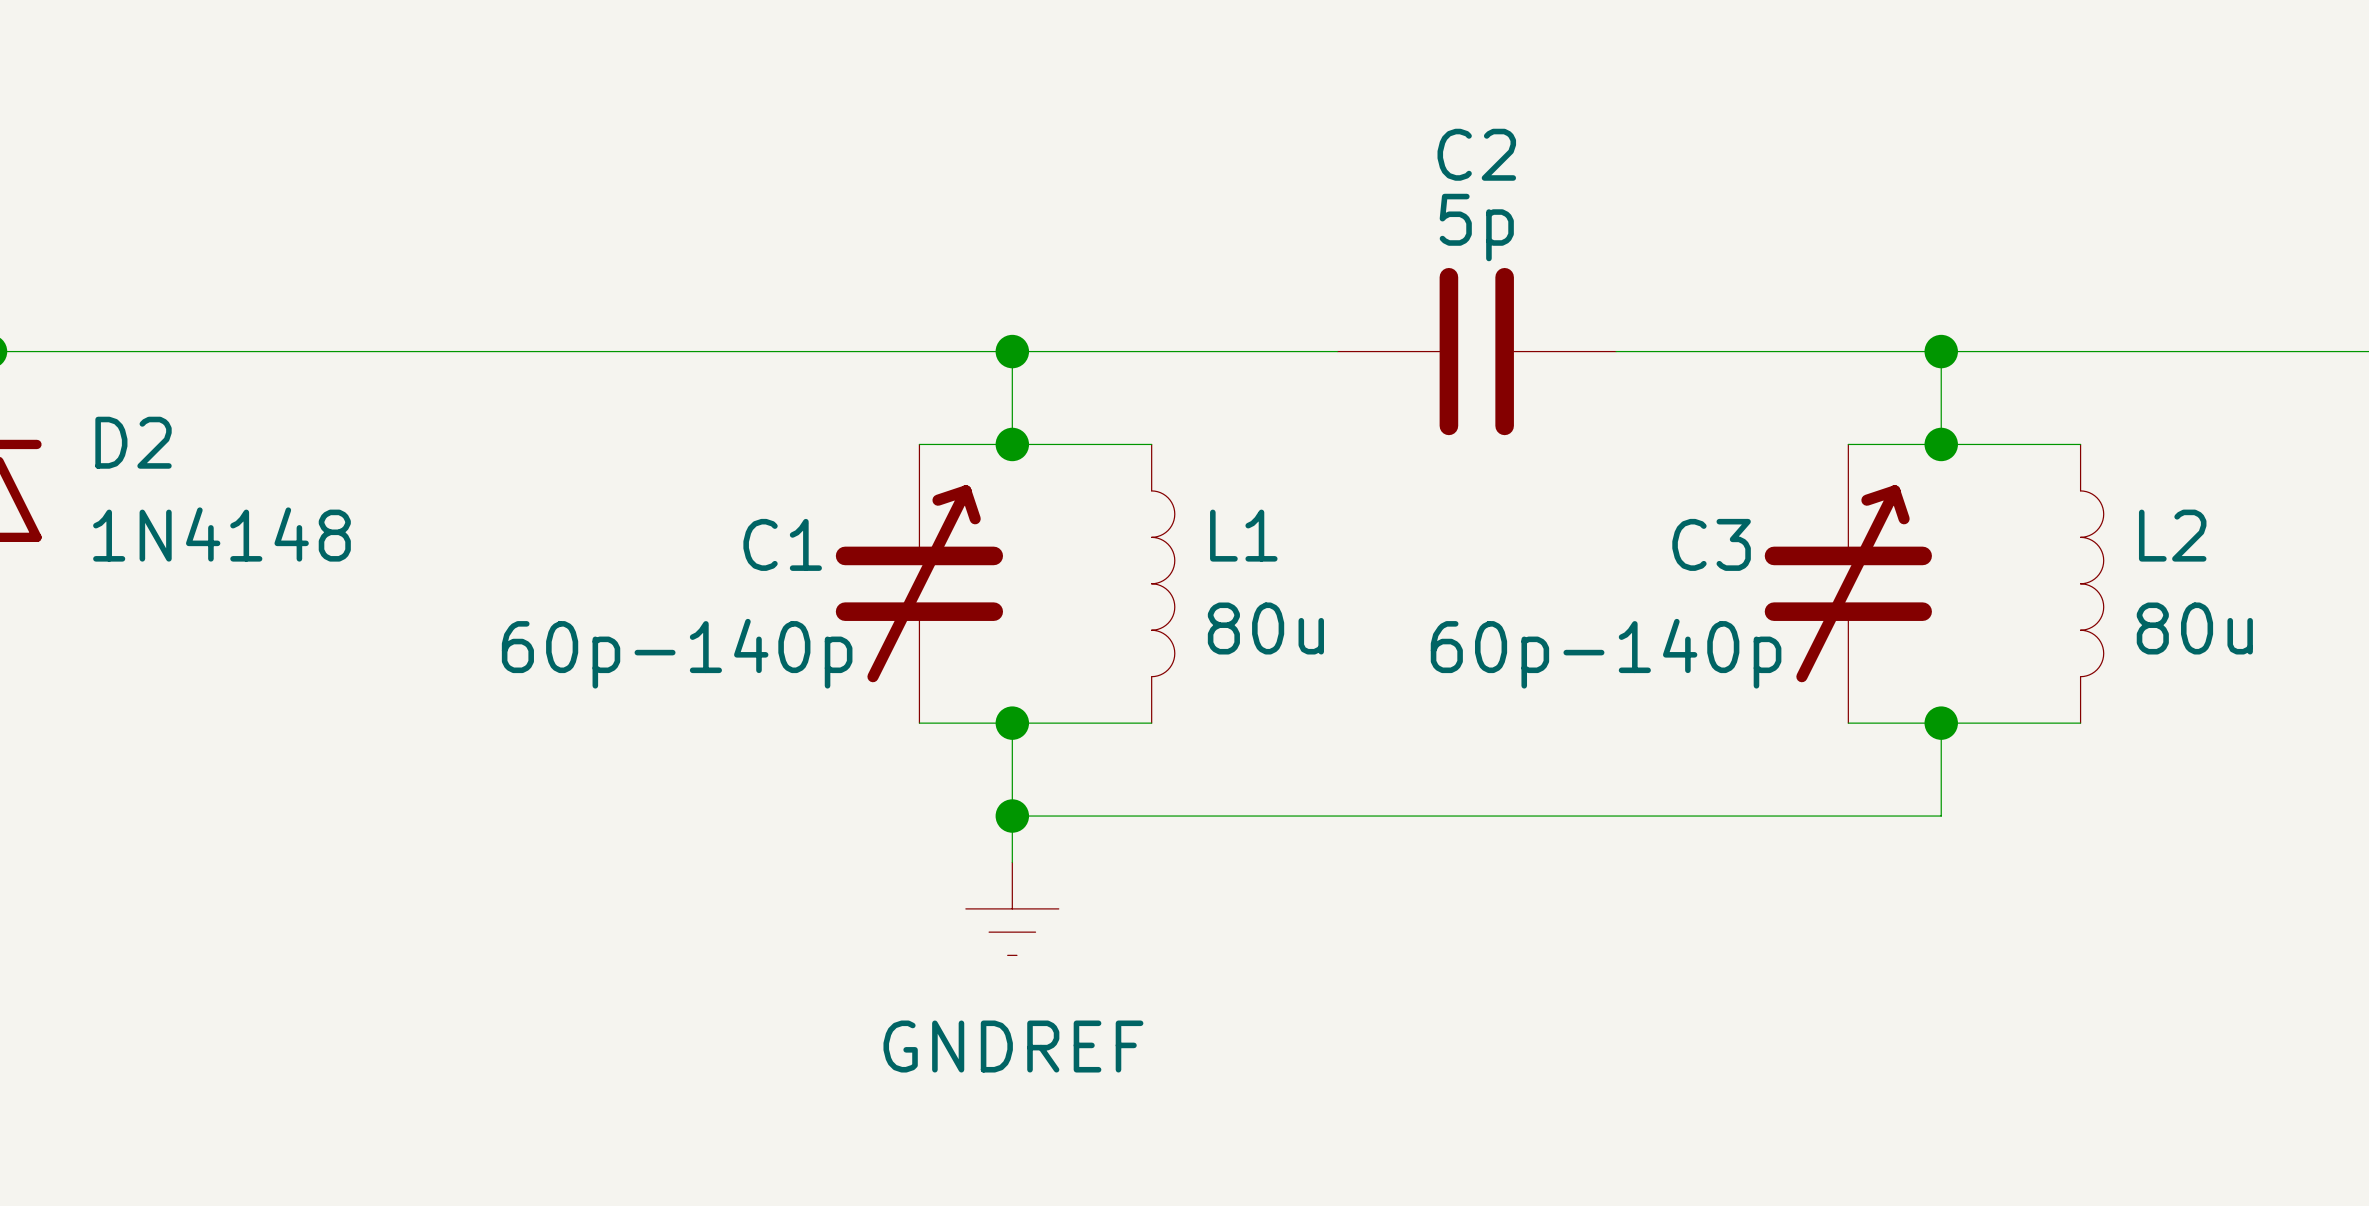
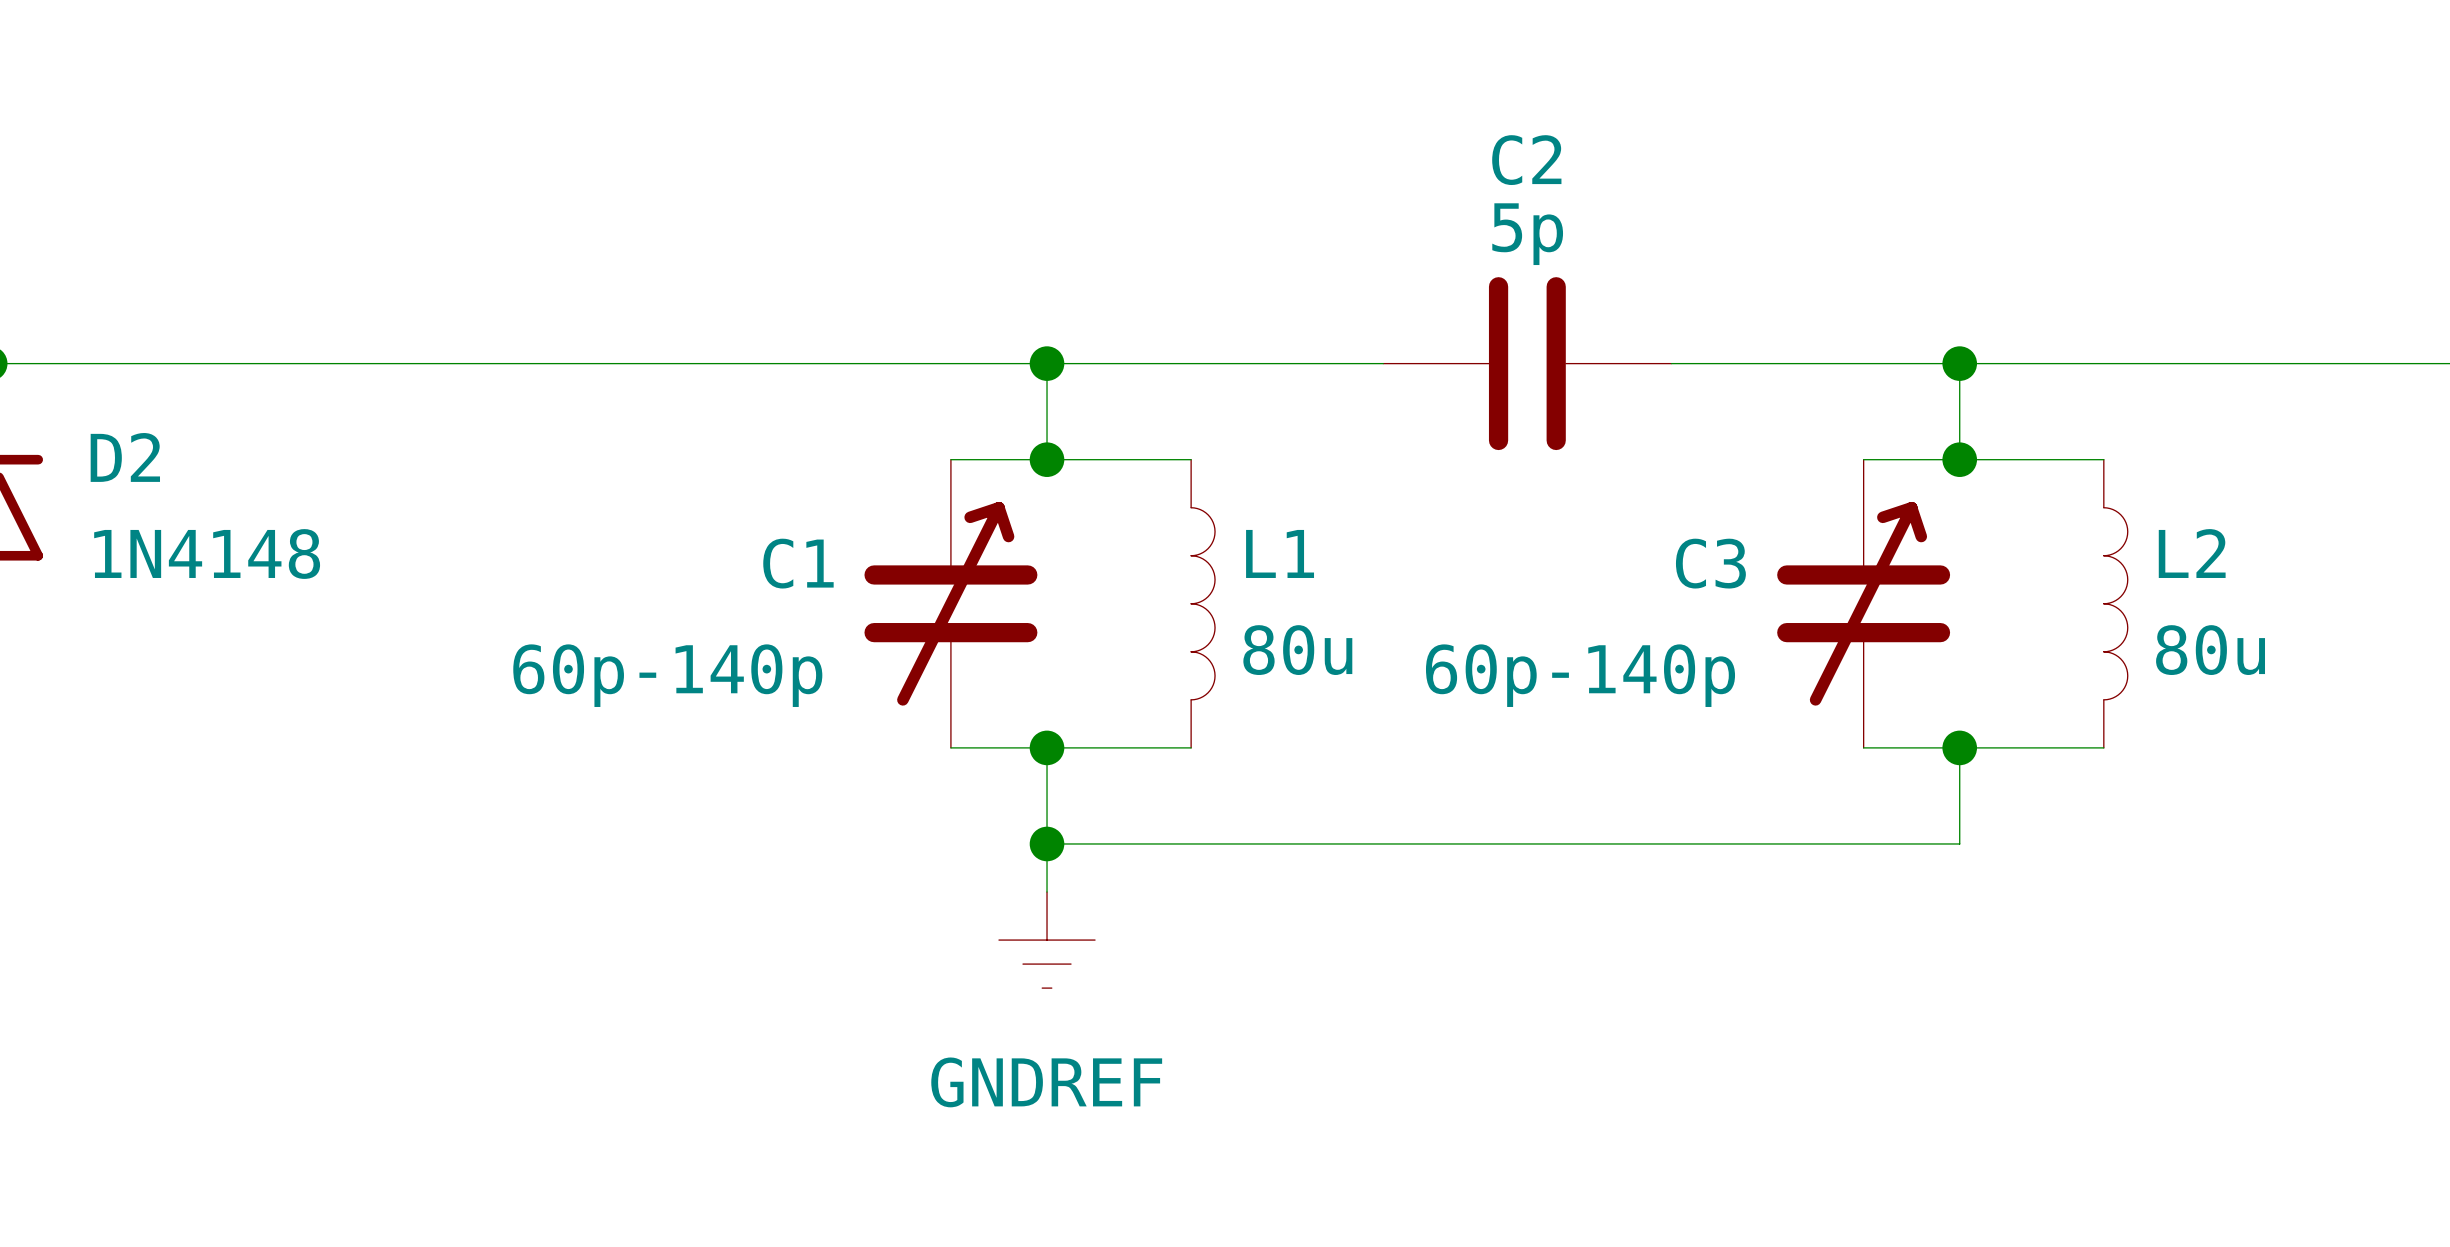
wire: (1941, 351) (1941, 444) -> (1959, 363) (1959, 459)
junction position: (1941, 351) -> (1959, 363)
junction position: (1941, 444) -> (1959, 459)
wire: (2034, 444) (2080, 444) -> (1863, 459) (1911, 459)
C3 position: (1848, 583) -> (1863, 603)
L2 position: (2092, 583) -> (2115, 603)
wire: (1941, 723) (1941, 816) (1894, 816) -> (1959, 747) (1959, 843)
junction position: (1941, 723) -> (1959, 747)
wire: (2034, 723) (2080, 723) -> (1863, 747) (1911, 747)

